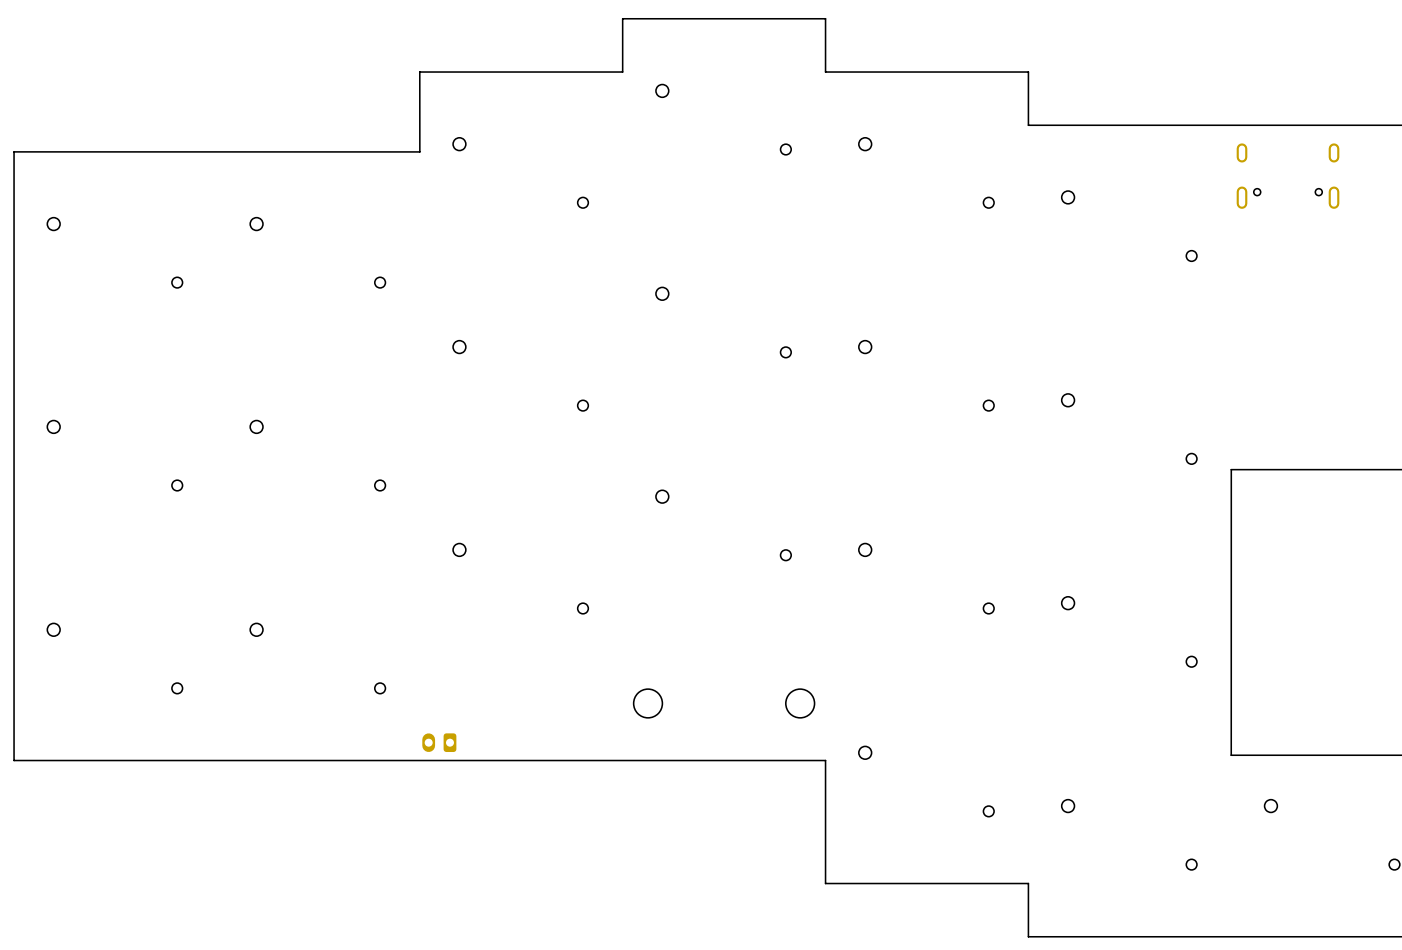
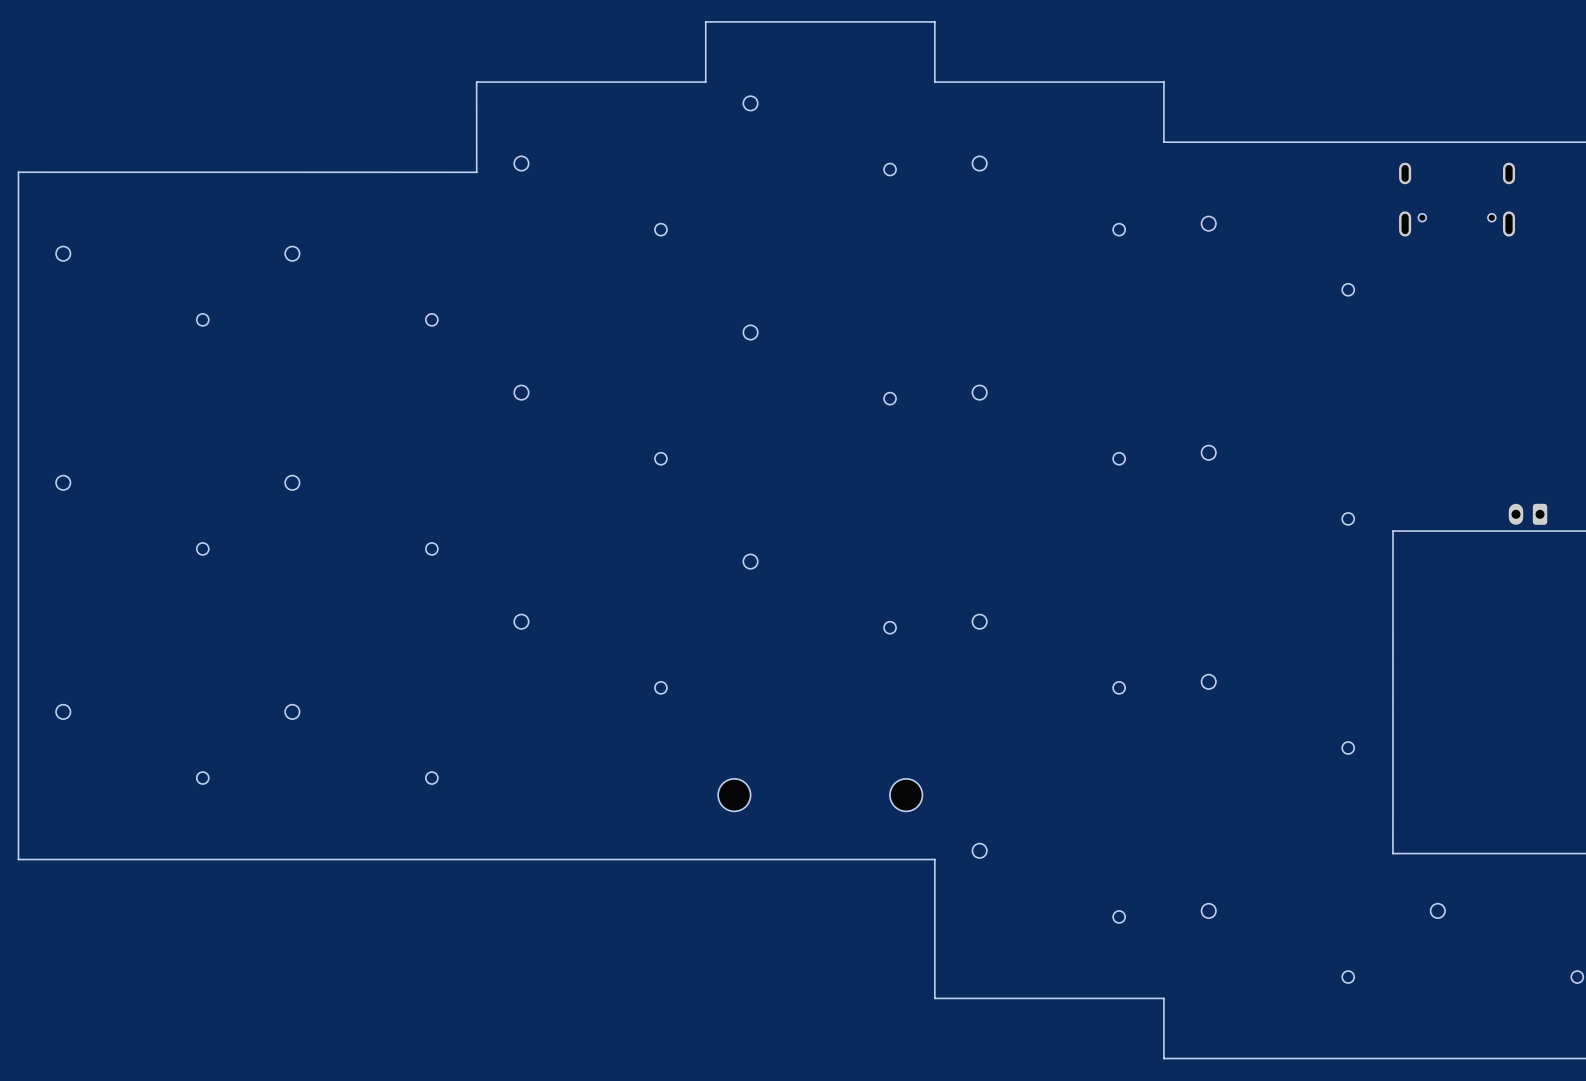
part: none -> (1528, 514)
part: (439, 742) -> none

